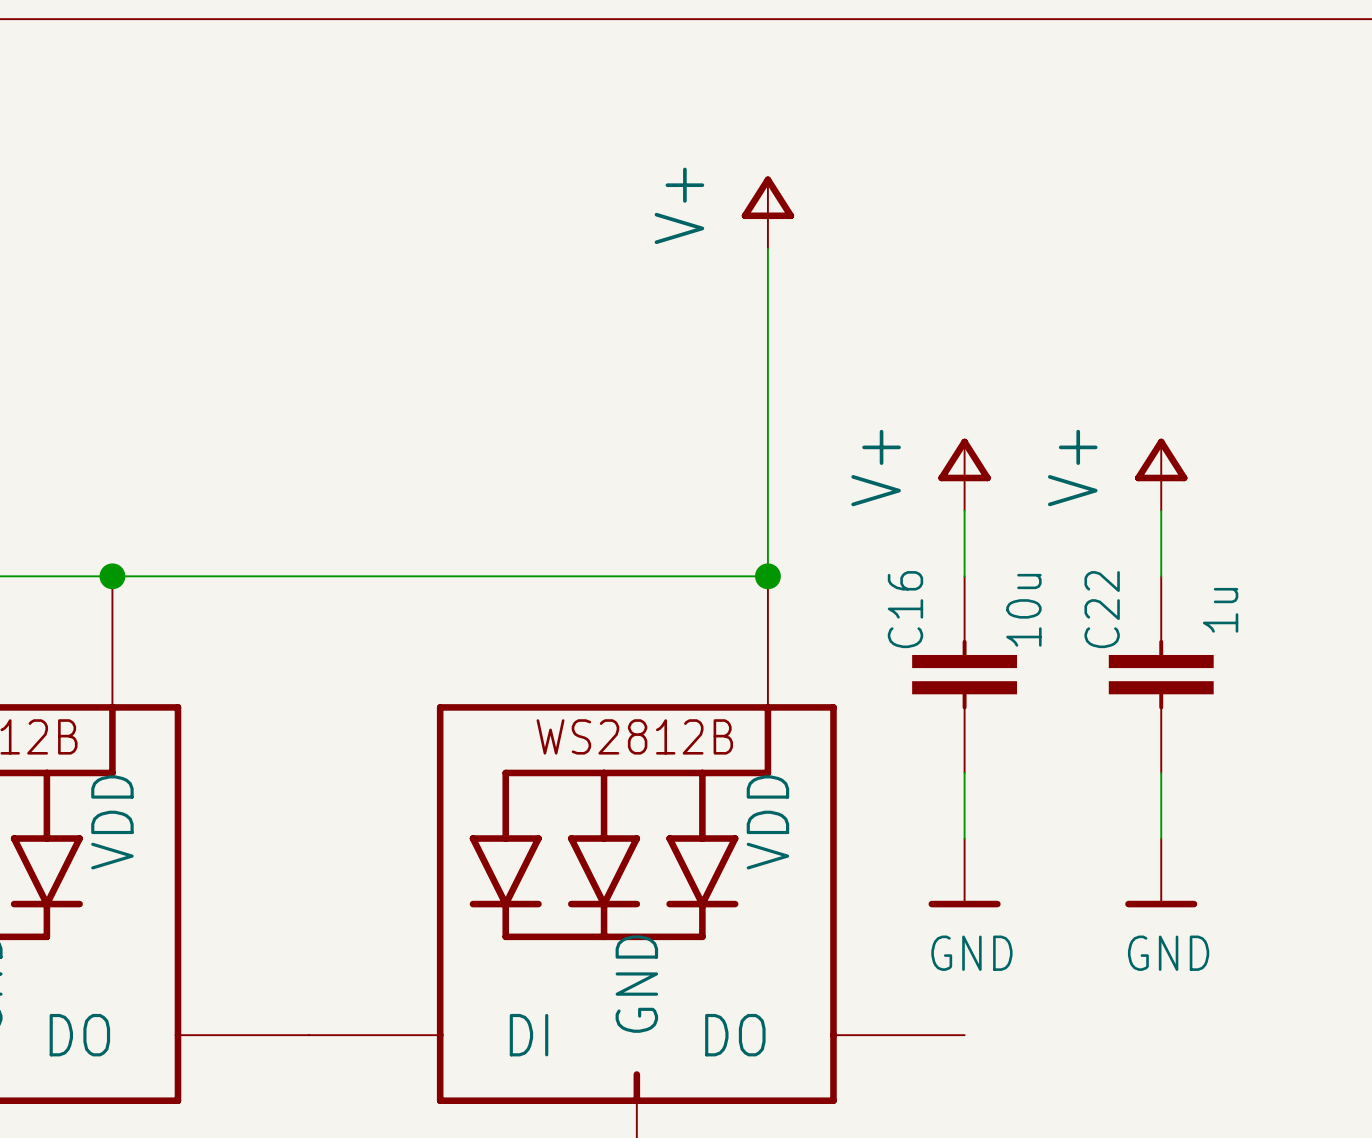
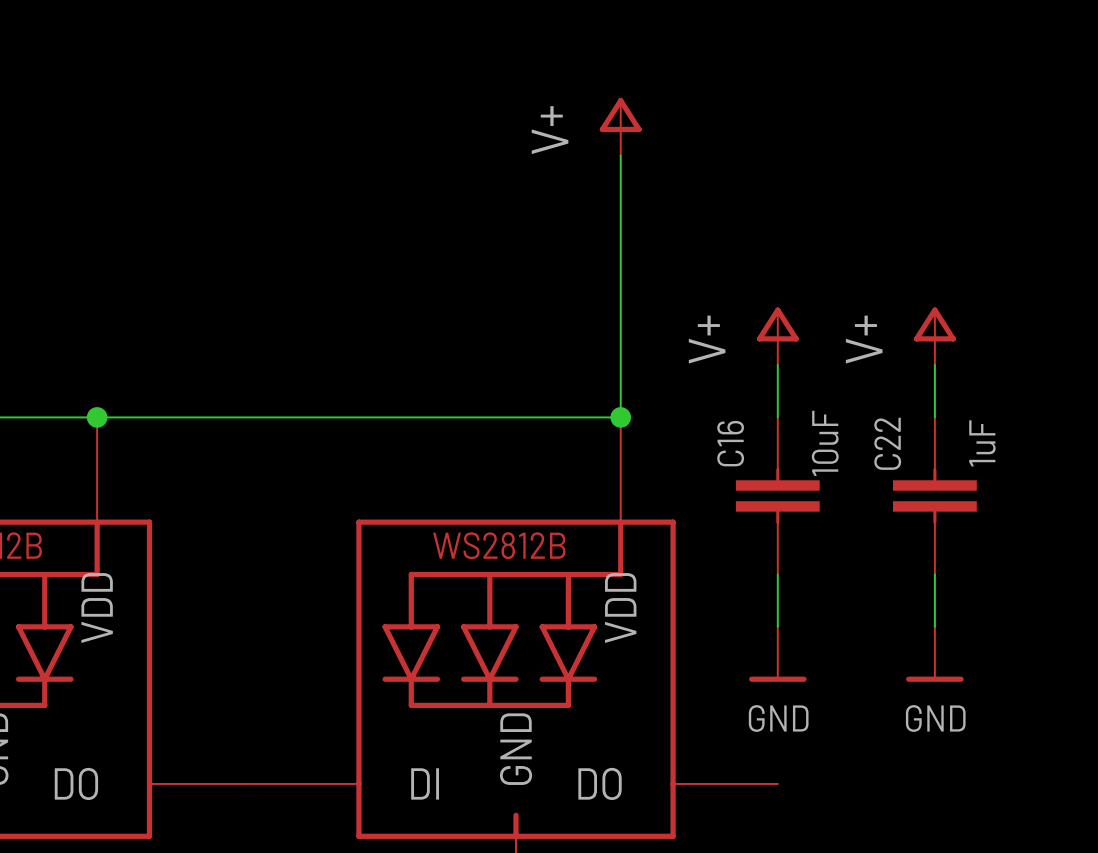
C16 value: 10u (1023, 610) -> 10uF (825, 443)
C22 value: 1u (1220, 610) -> 1uF (982, 443)

